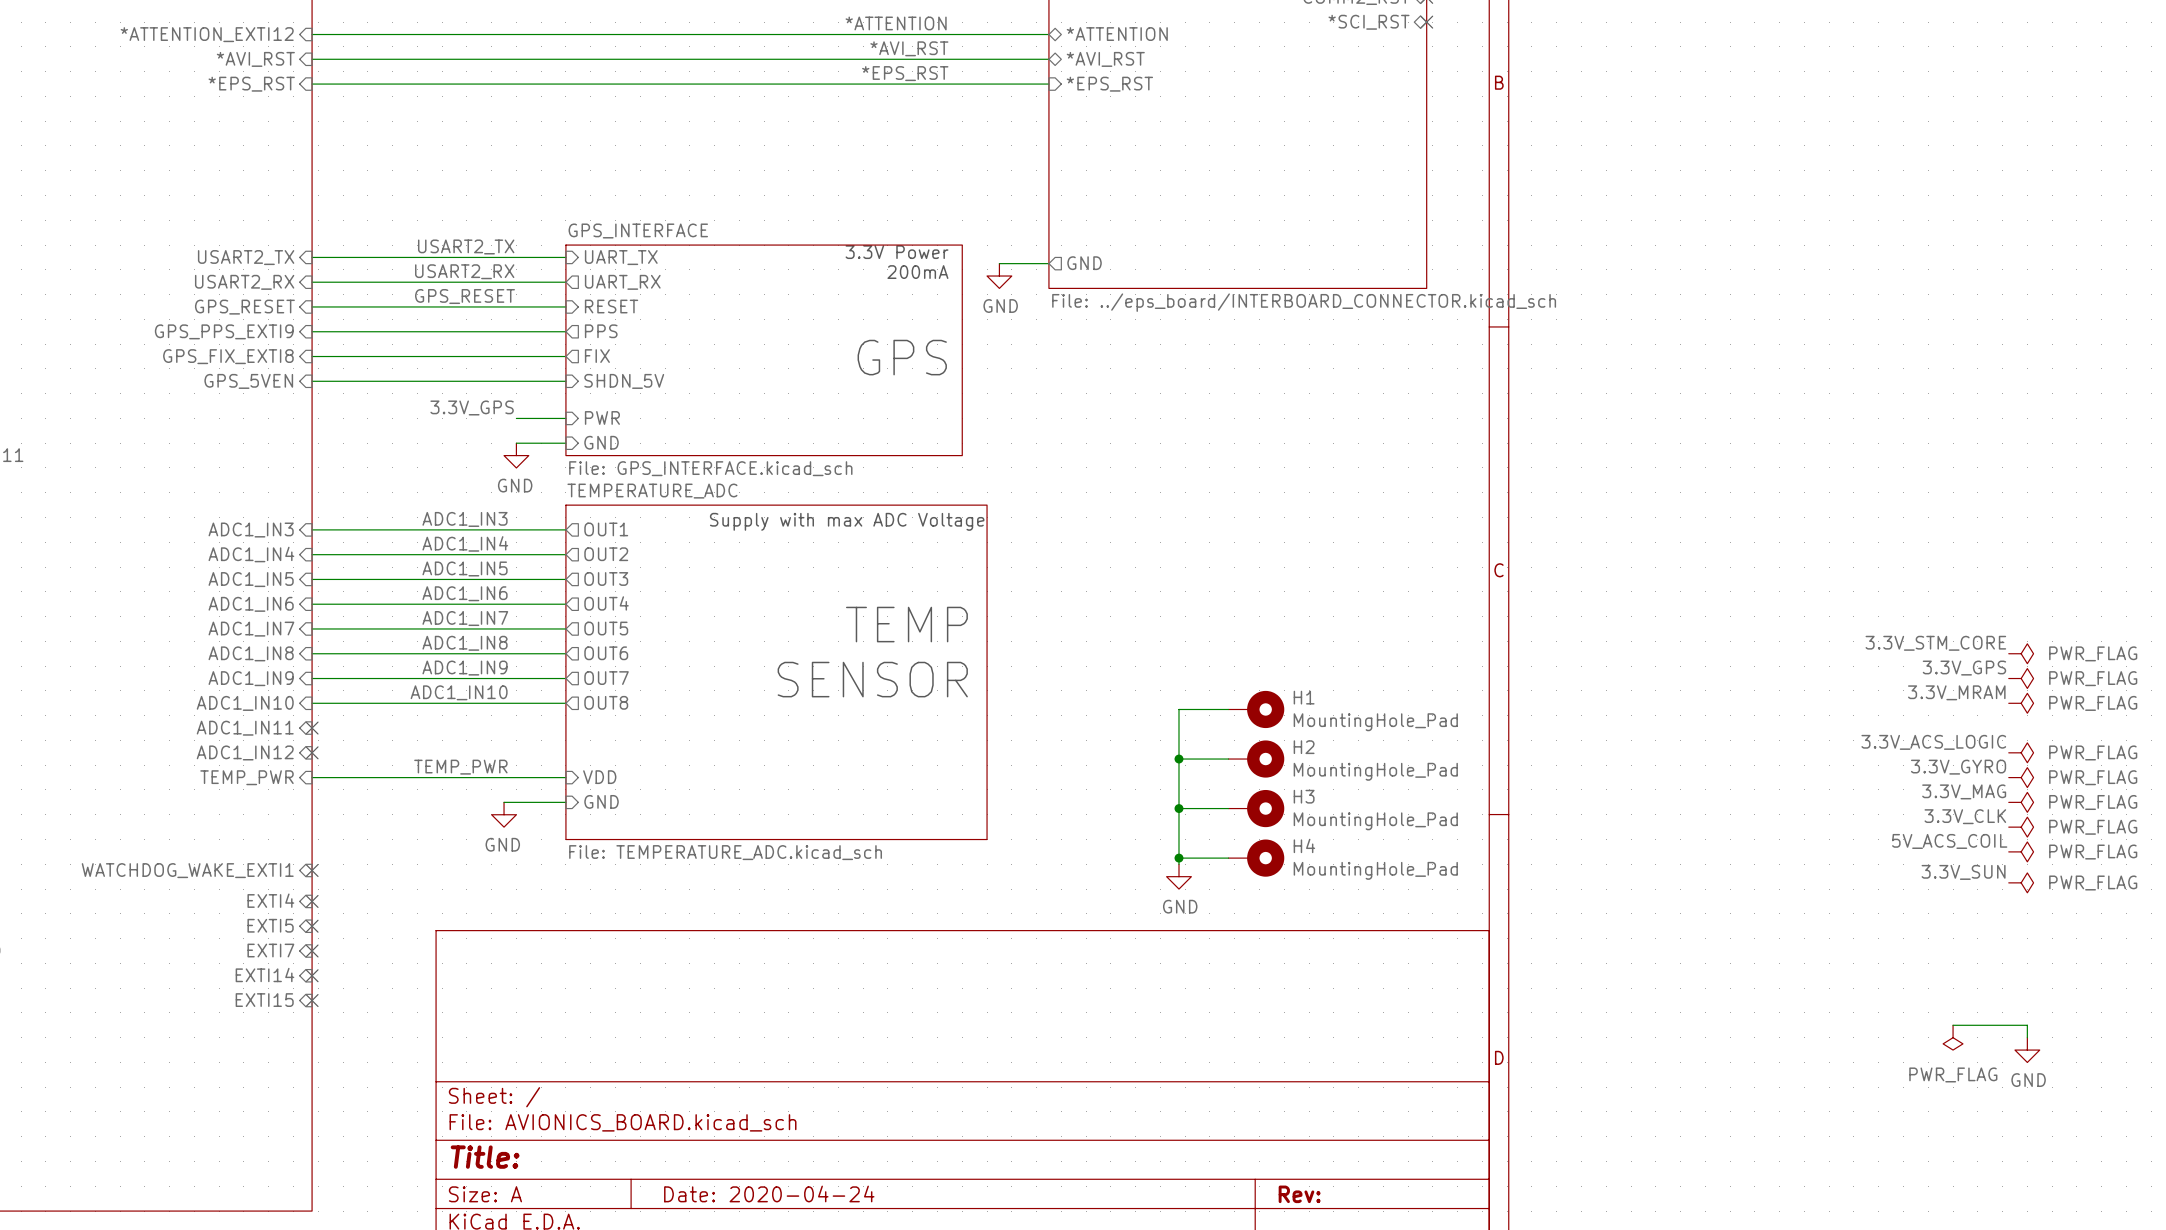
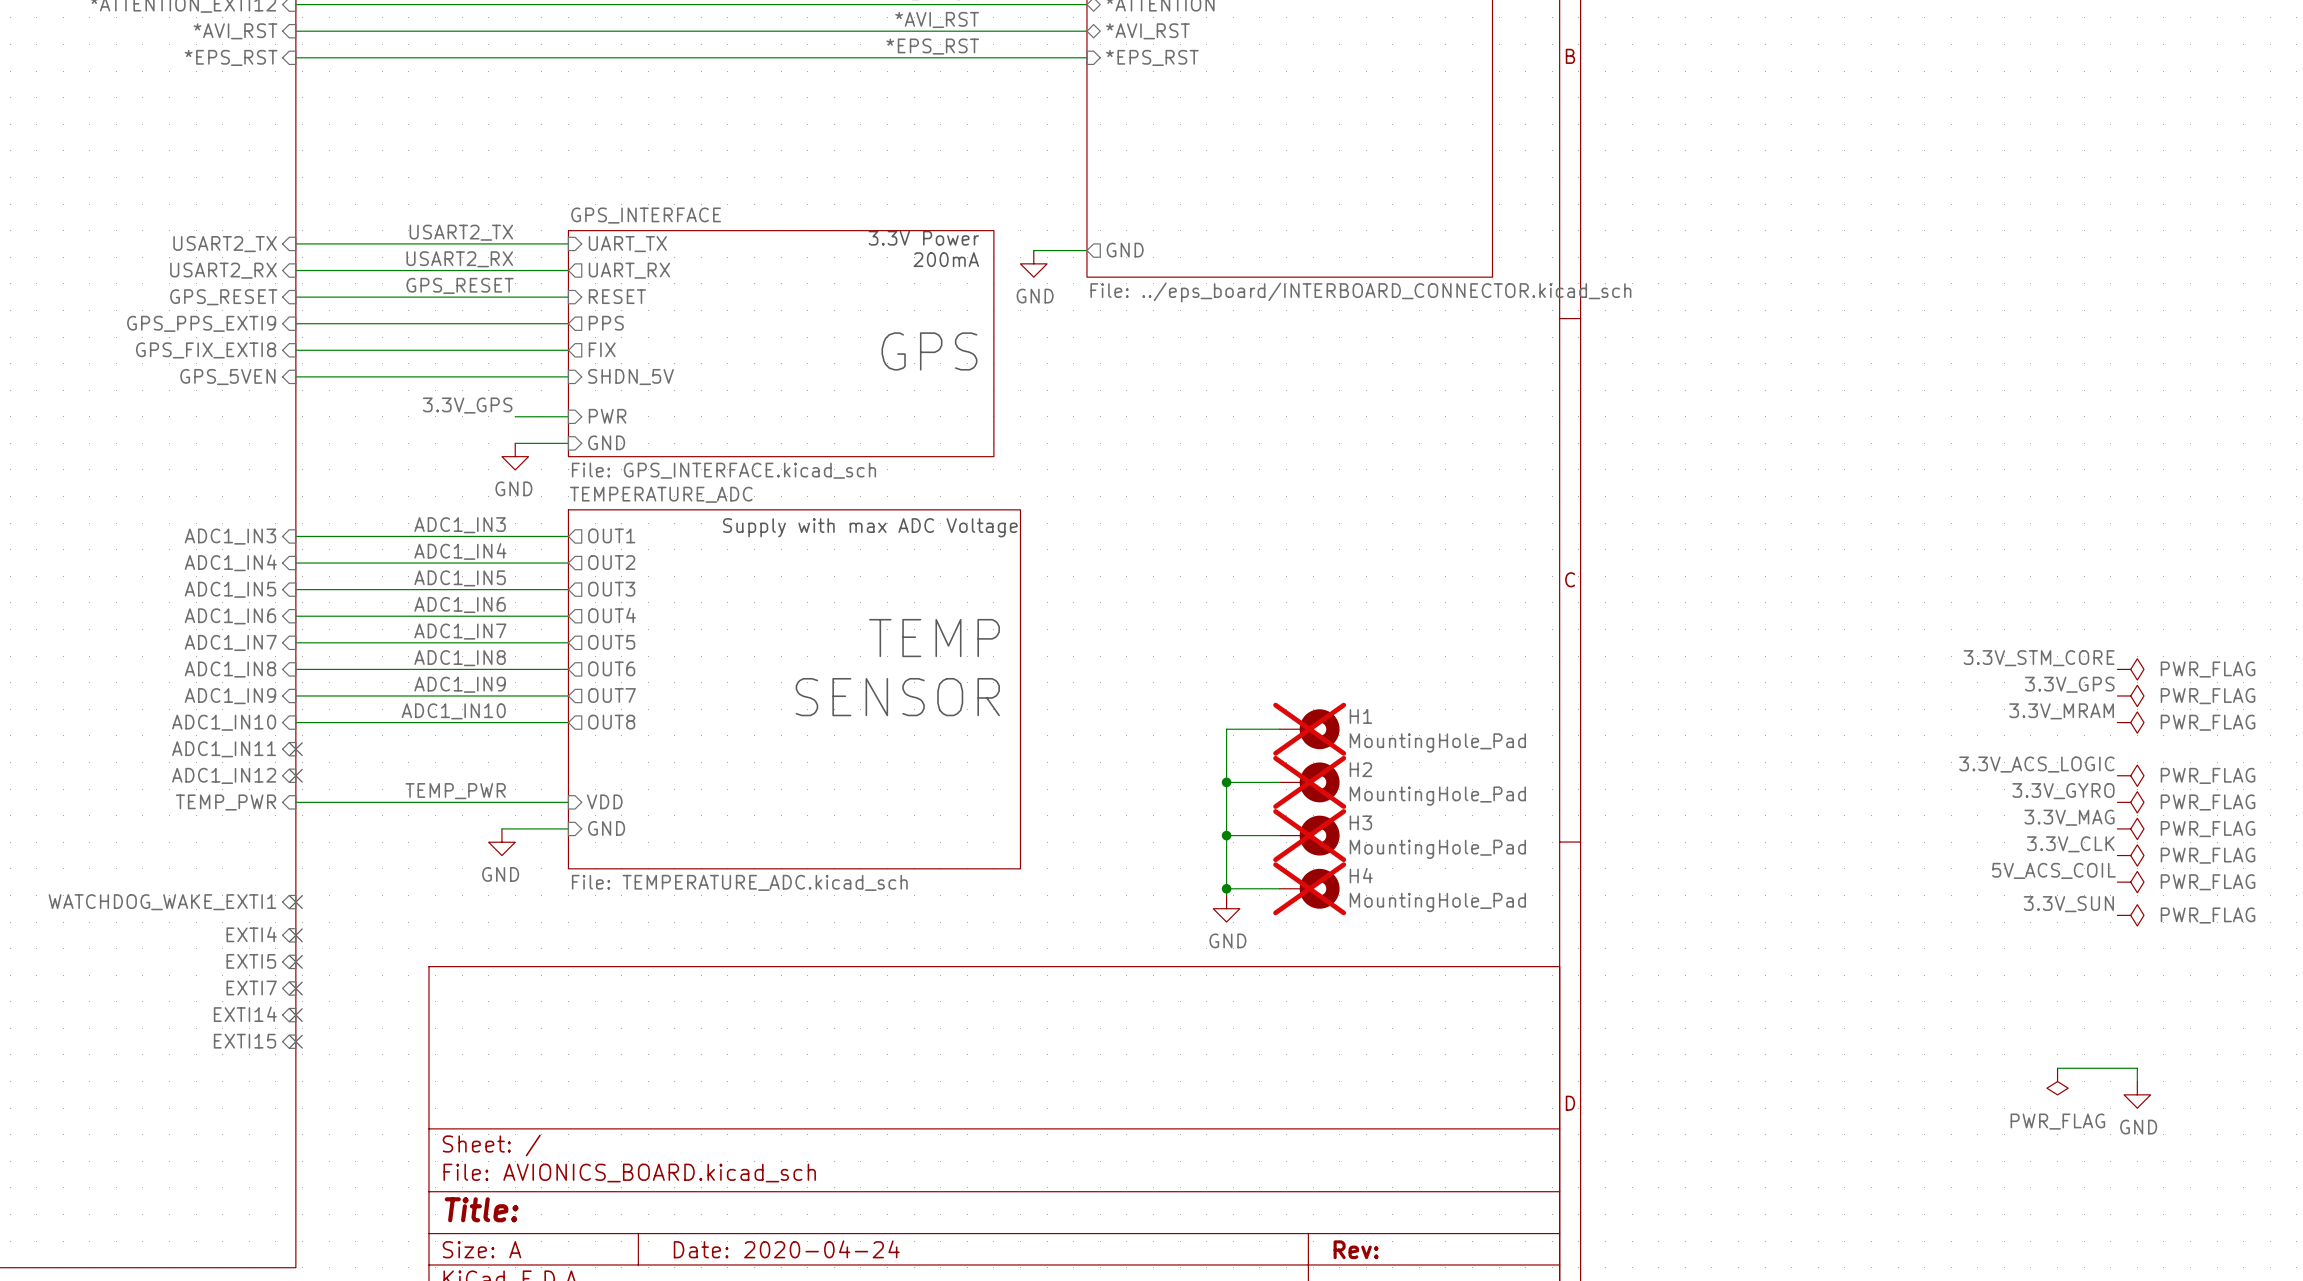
H1 do-not-place cross: none -> (1309, 729)
H2 do-not-place cross: none -> (1309, 782)
H3 do-not-place cross: none -> (1309, 835)
H4 do-not-place cross: none -> (1309, 888)

